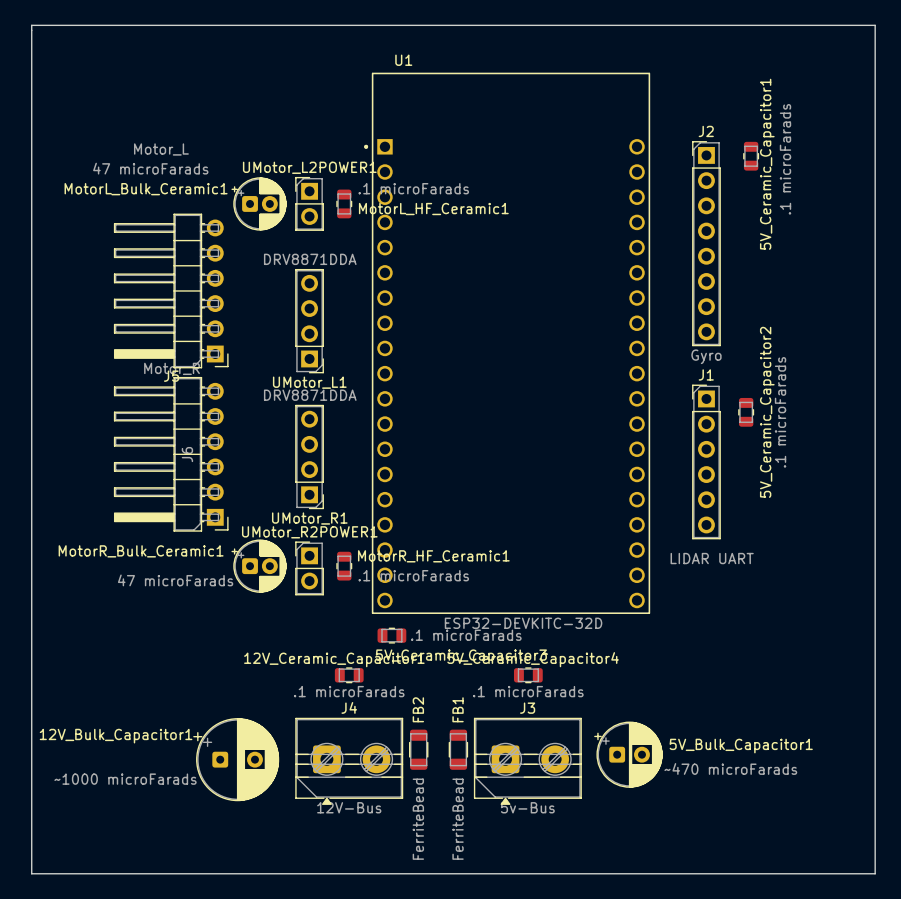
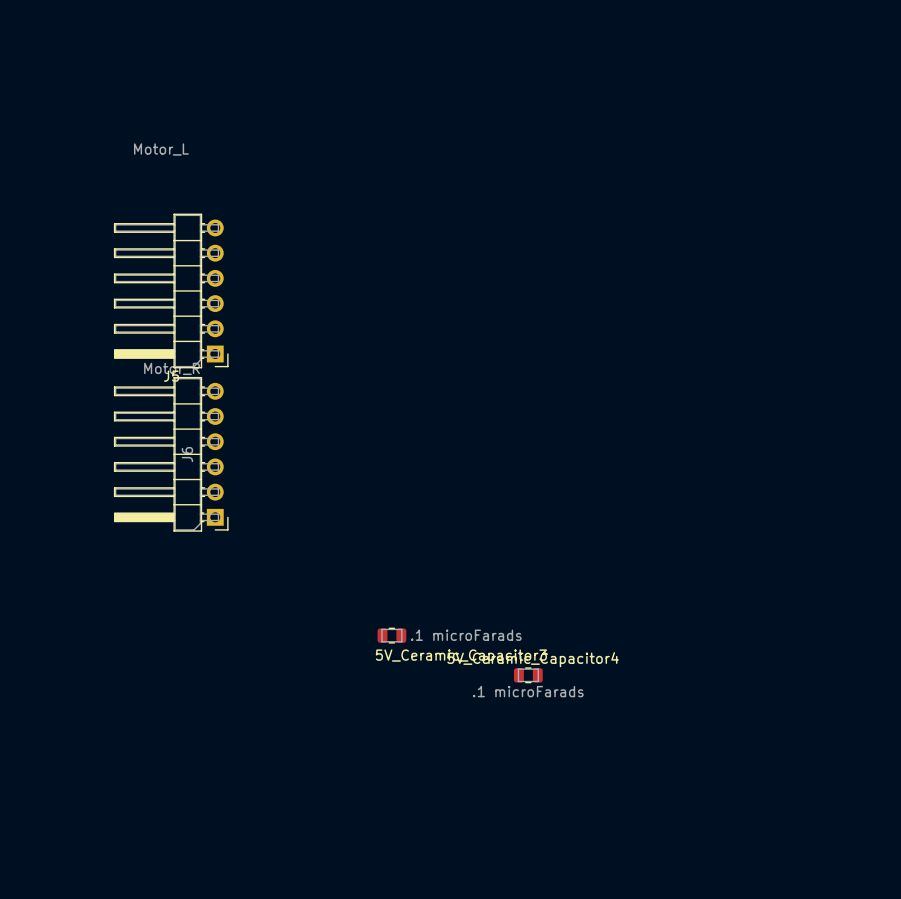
board edge: (31, 25) (31, 873) (875, 873) (875, 25) (31, 25) -> none
5V_Ceramic_Capacitor1: .1 microFarads (751, 156) -> none
MotorL_Bulk_Ceramic1: 47 microFarads (259, 203) -> none
UMotor_L2POWER1: (309, 203) -> none
MotorL_HF_Ceramic1: .1 microFarads (344, 203) -> none
J2: Gyro (706, 243) -> none
UMotor_L1: DRV8871DDA (309, 321) -> none
U1: ESP32-DEVKITC-32D (507, 343) -> none
5V_Ceramic_Capacitor2: .1 microFarads (746, 412) -> none
UMotor_R1: DRV8871DDA (309, 457) -> none
J1: LIDAR UART (706, 461) -> none
MotorR_Bulk_Ceramic1: 47 microFarads (259, 566) -> none
MotorR_HF_Ceramic1: .1 microFarads (344, 566) -> none
UMotor_R2POWER1: (309, 568) -> none
12V_Ceramic_Capacitor1: .1 microFarads (349, 675) -> none
FB2: FerriteBead (418, 749) -> none
FB1: FerriteBead (458, 749) -> none
5V_Bulk_Capacitor1: ~470 microFarads (628, 754) -> none
12V_Bulk_Capacitor1: ~1000 microFarads (236, 759) -> none
J4: 12V-Bus (349, 761) -> none
J3: 5v-Bus (527, 761) -> none

